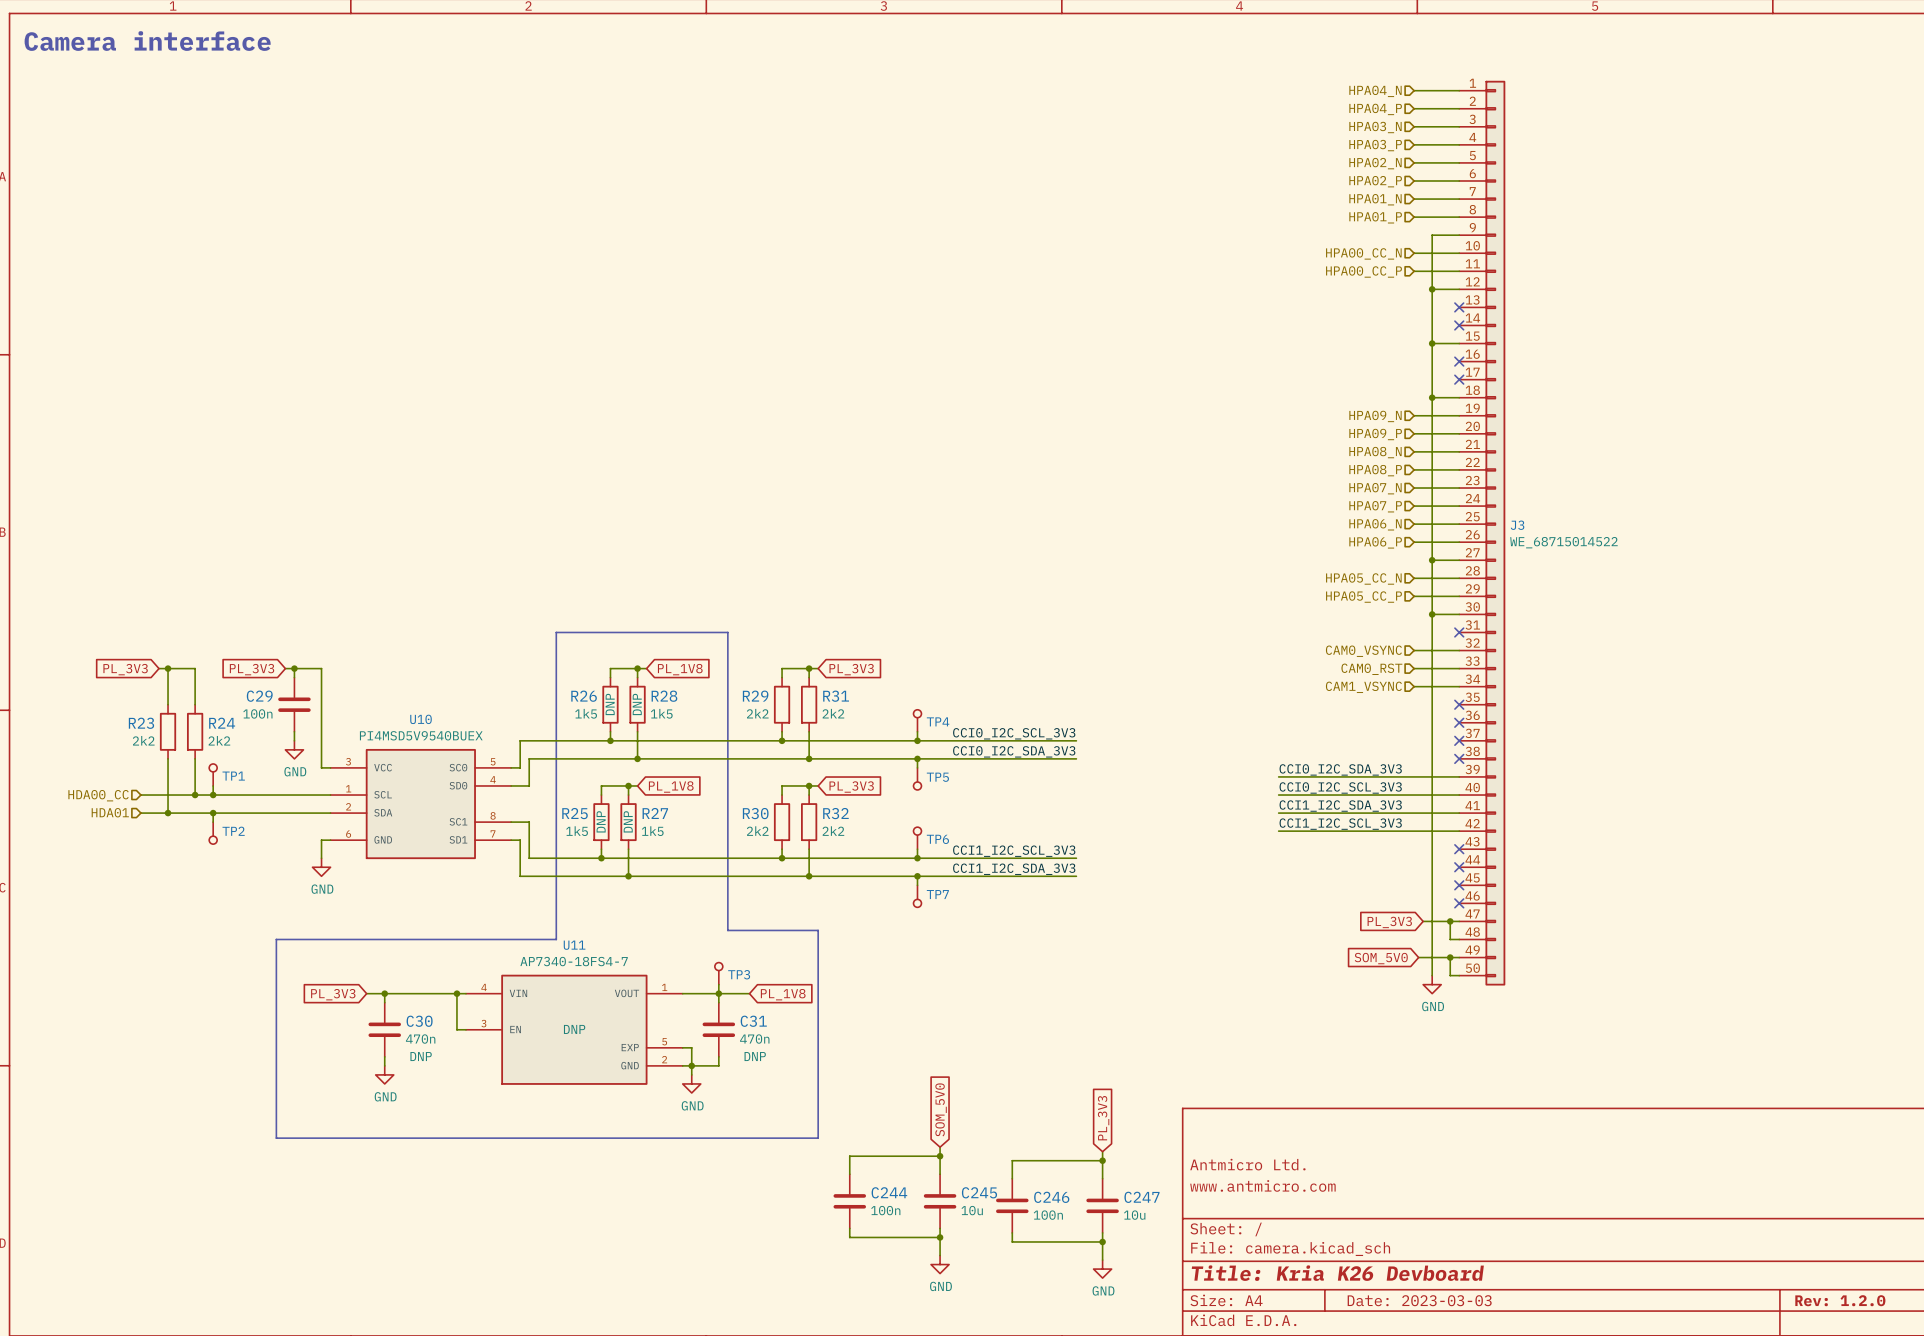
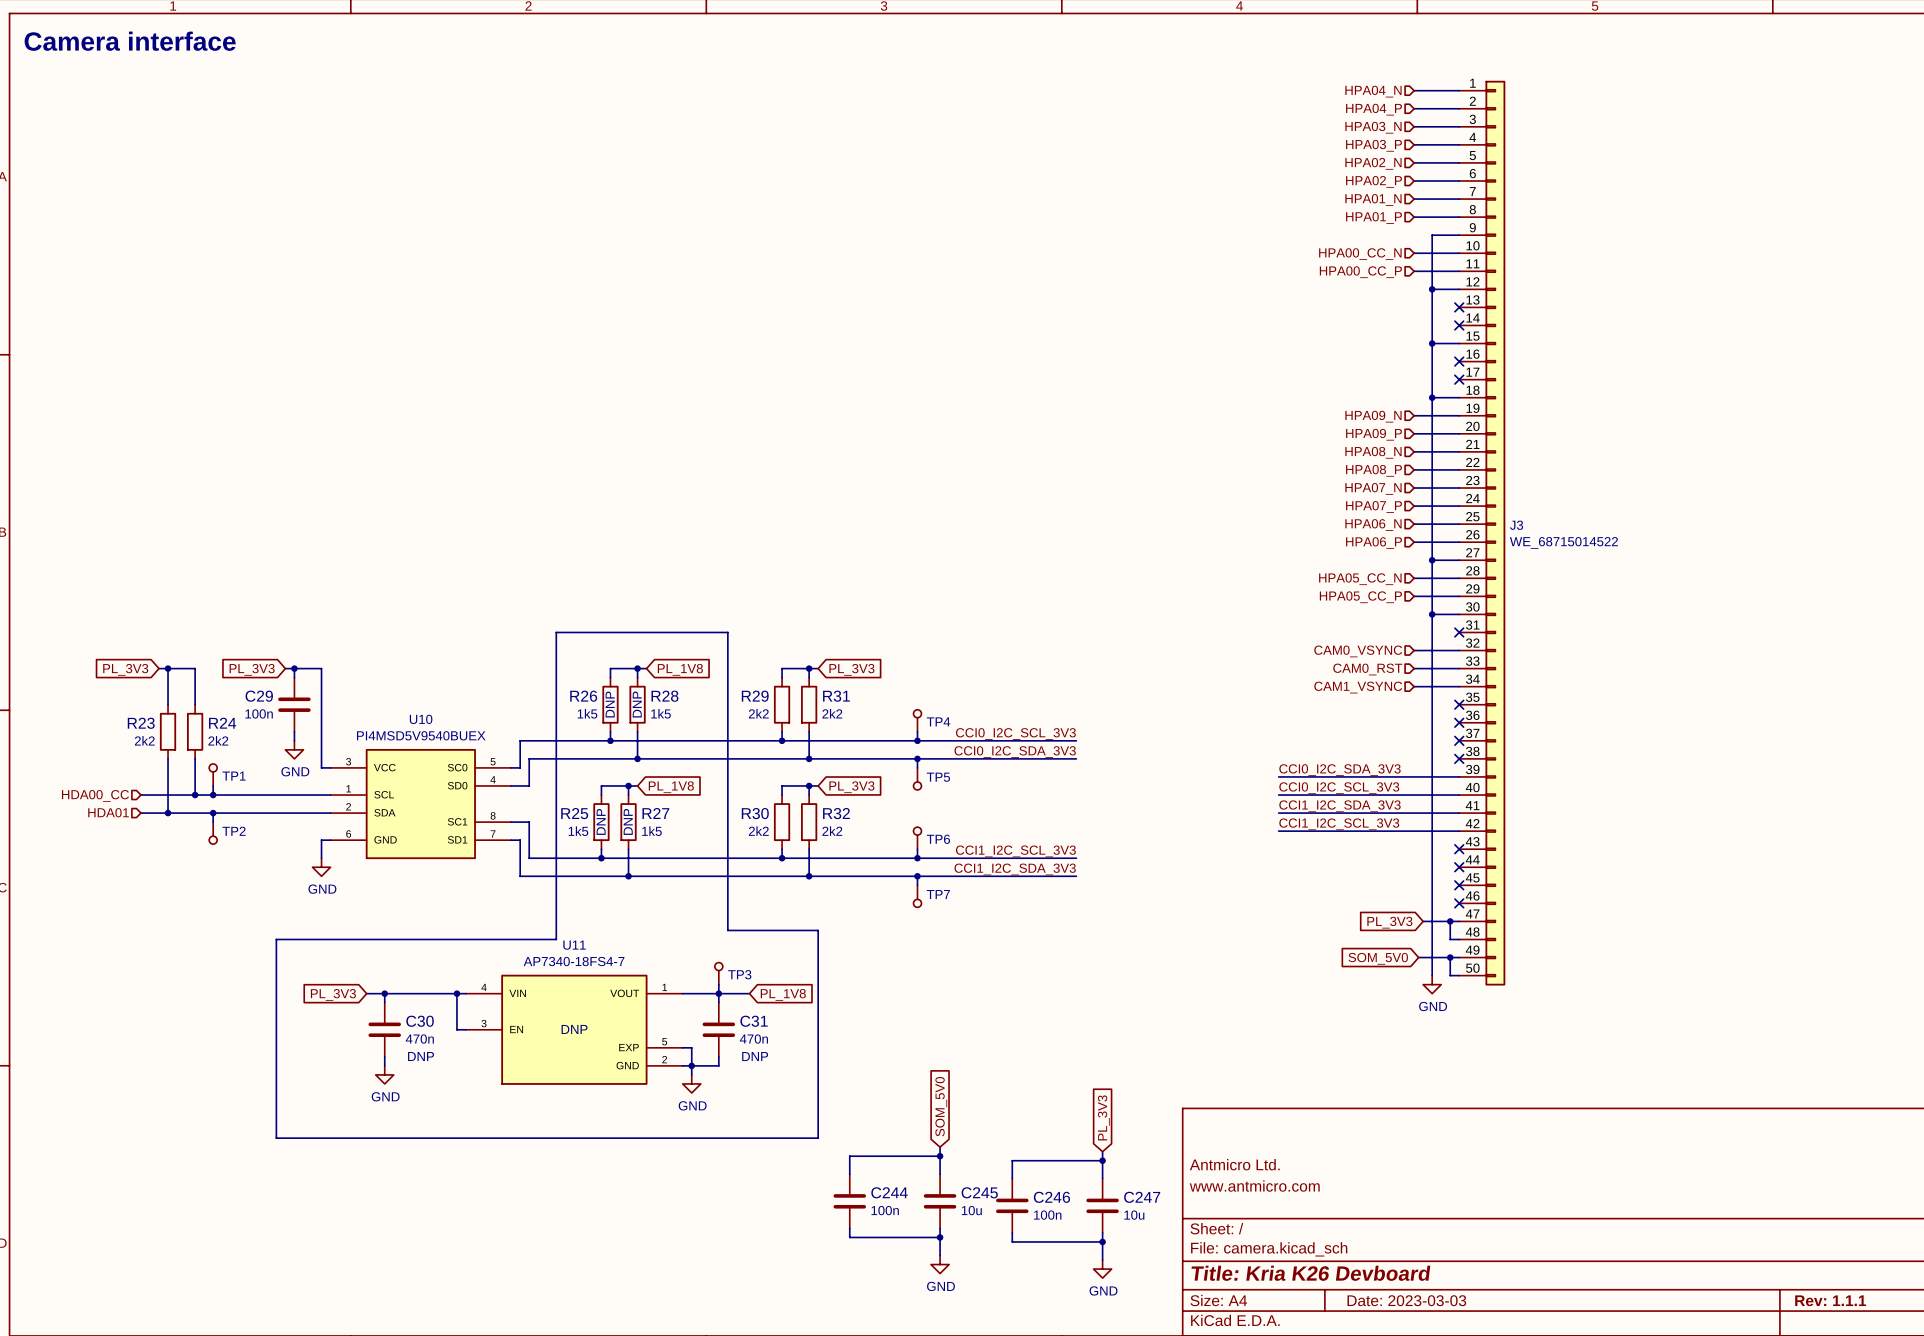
title block: Rev: 1.2.0 (1840, 1300) -> Rev: 1.1.1 (1830, 1300)

